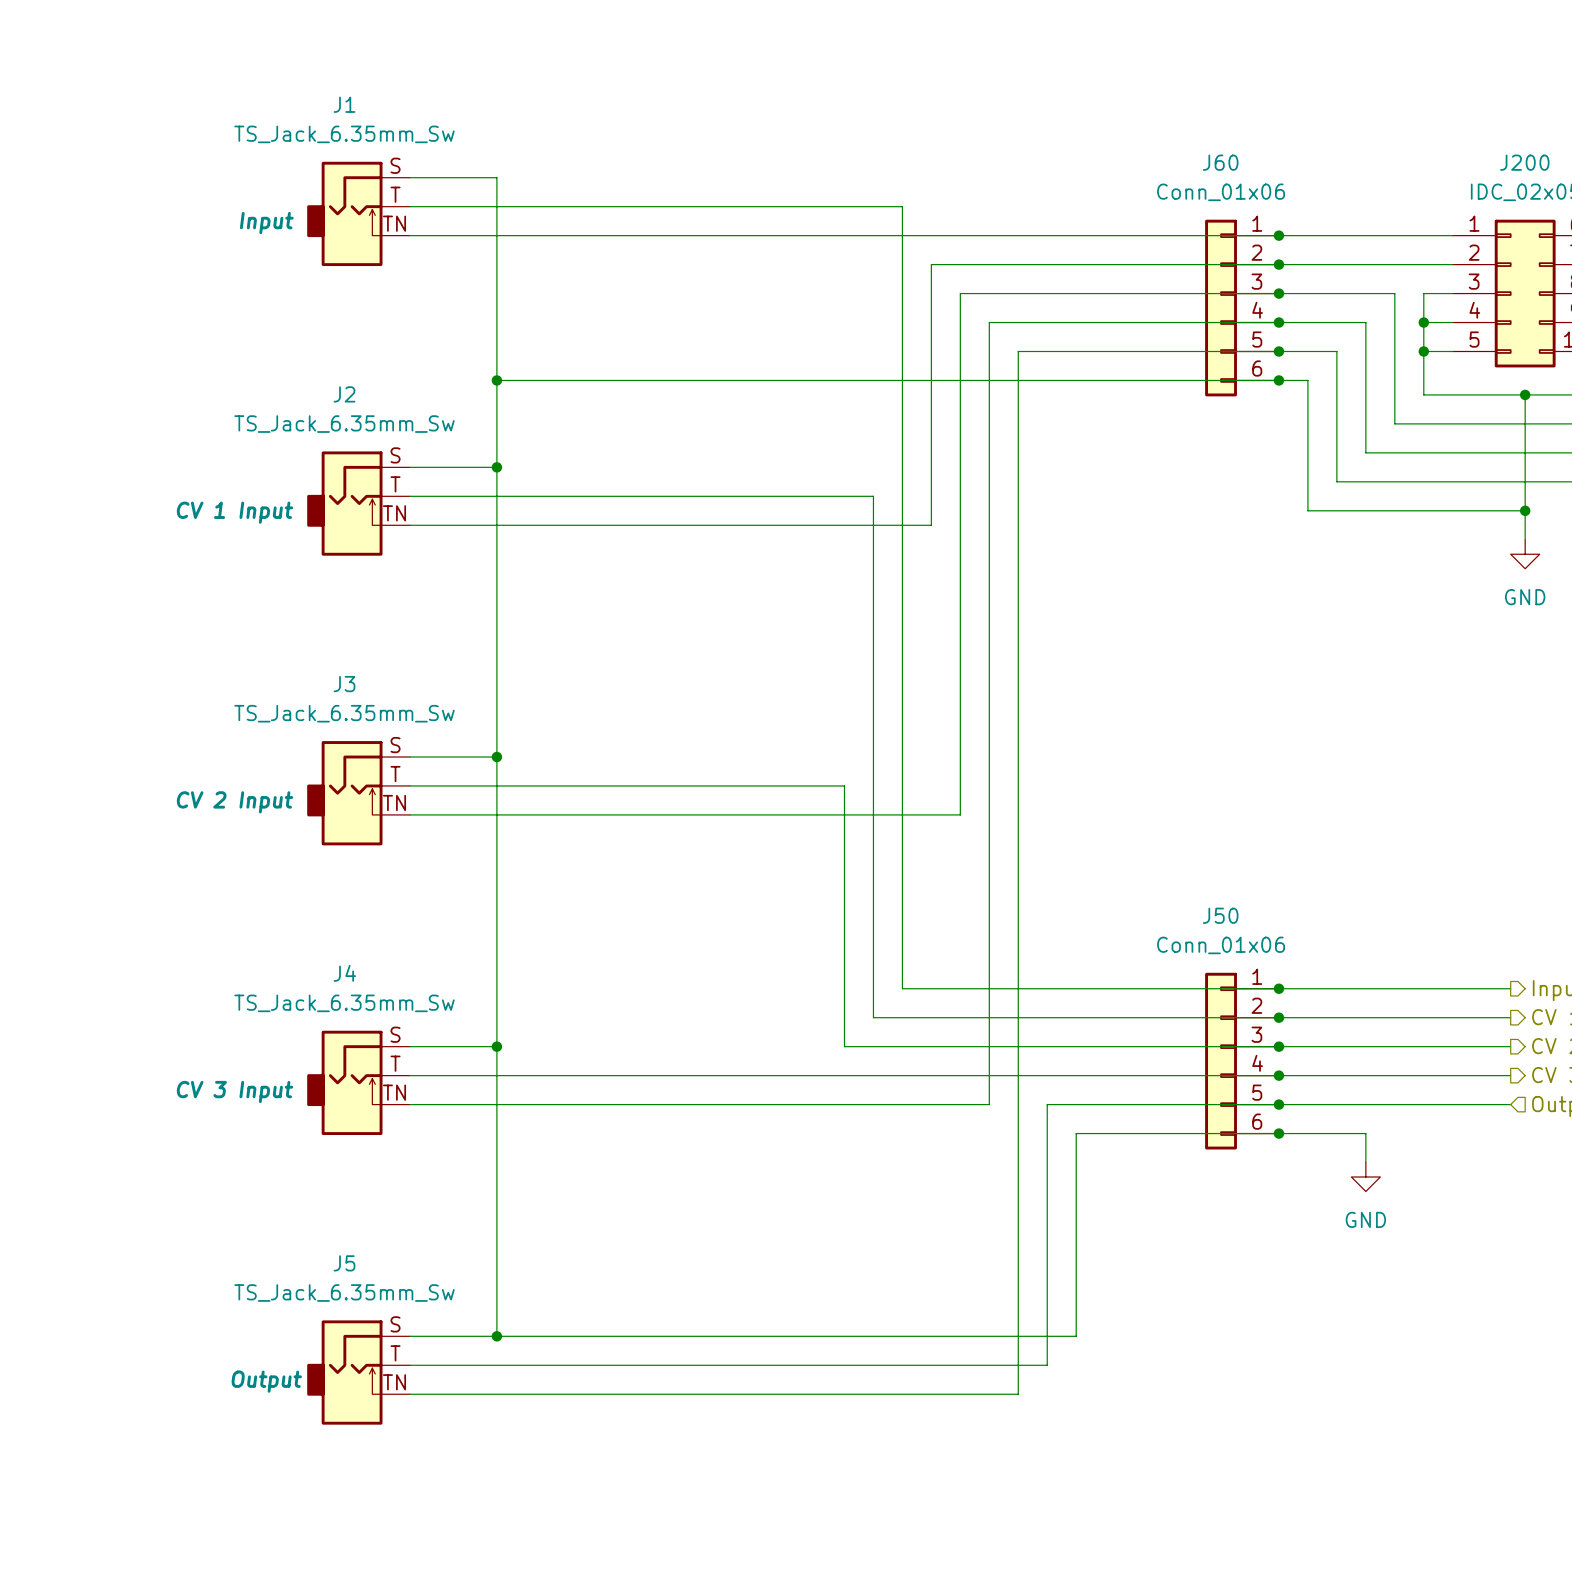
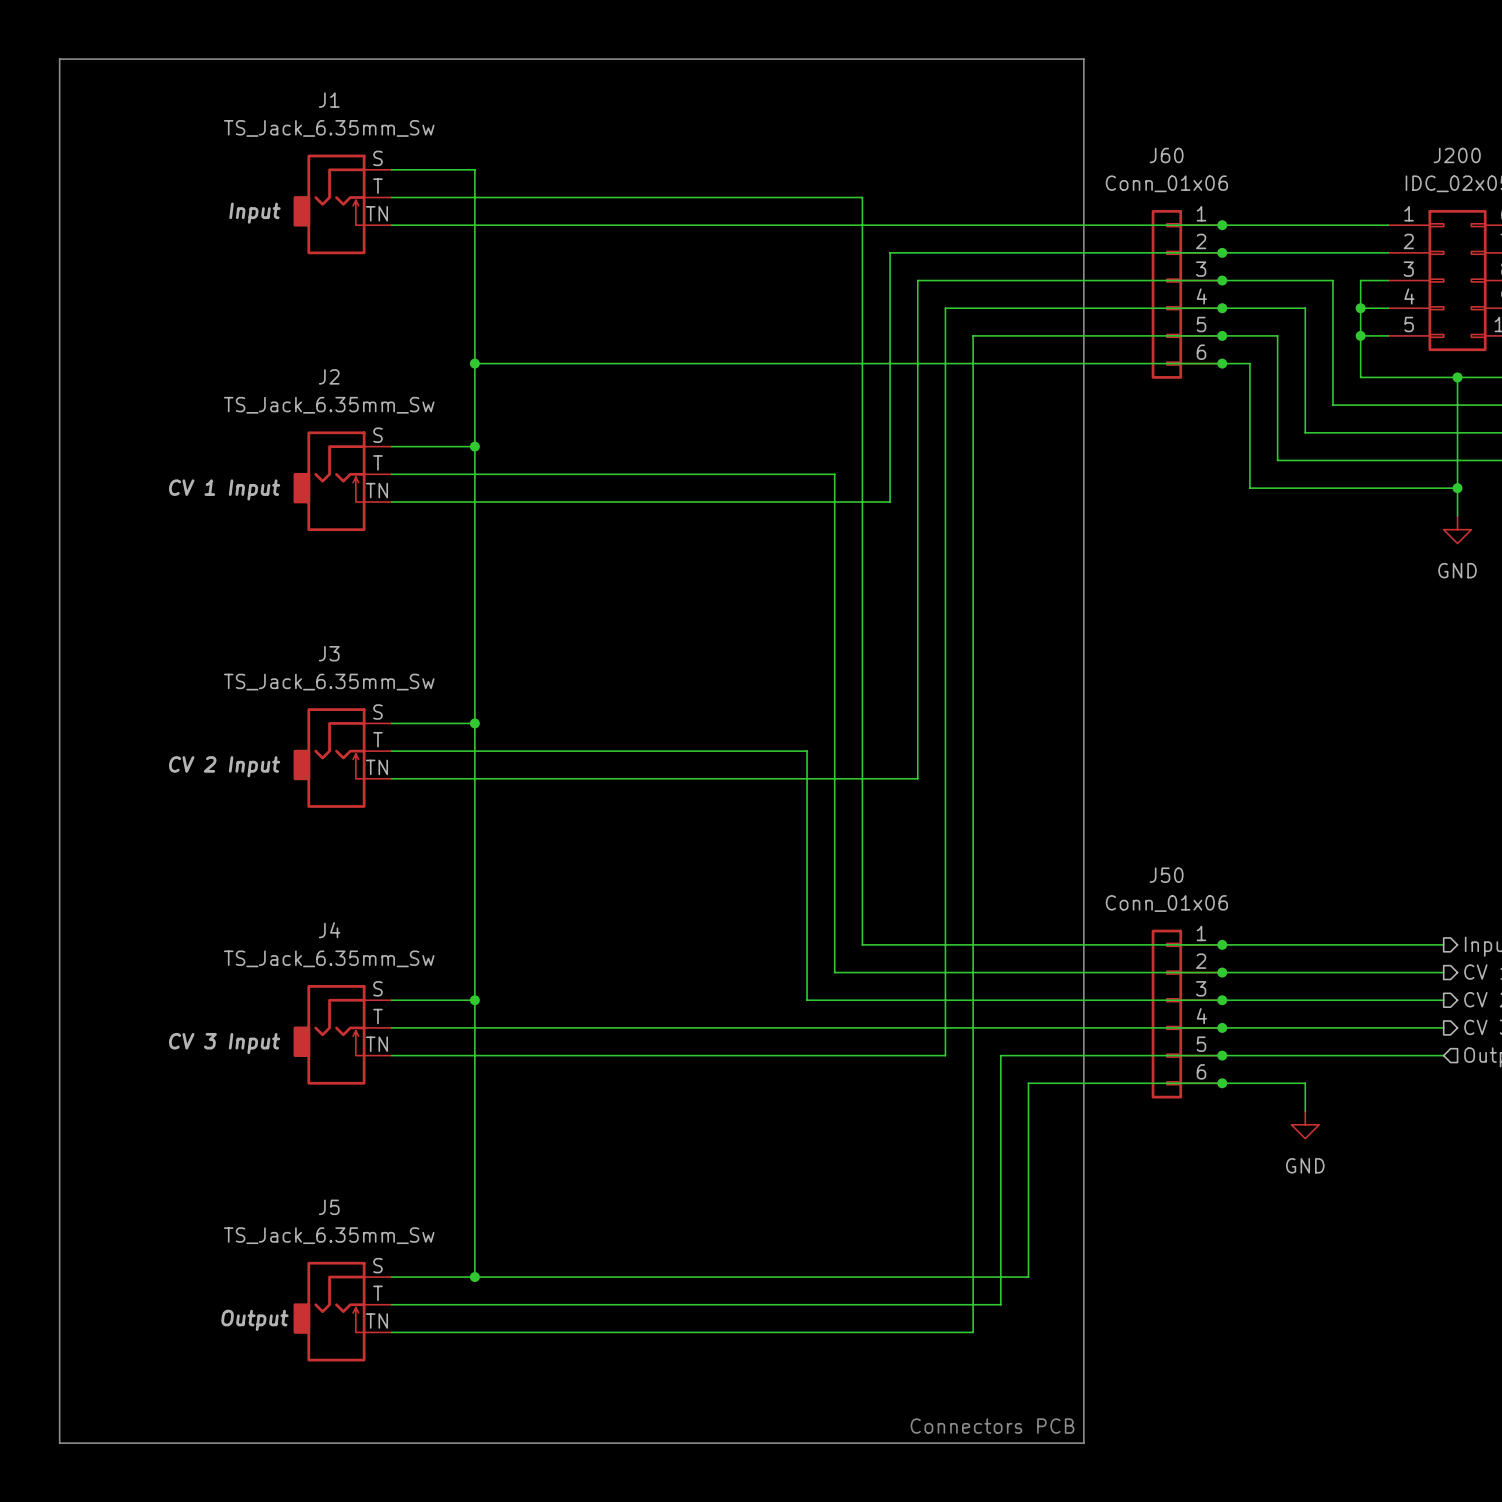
line: none -> (59, 59) (1083, 59) (1083, 1443) (59, 1443) (59, 59)
text: none -> Connectors PCB (992, 1426)

